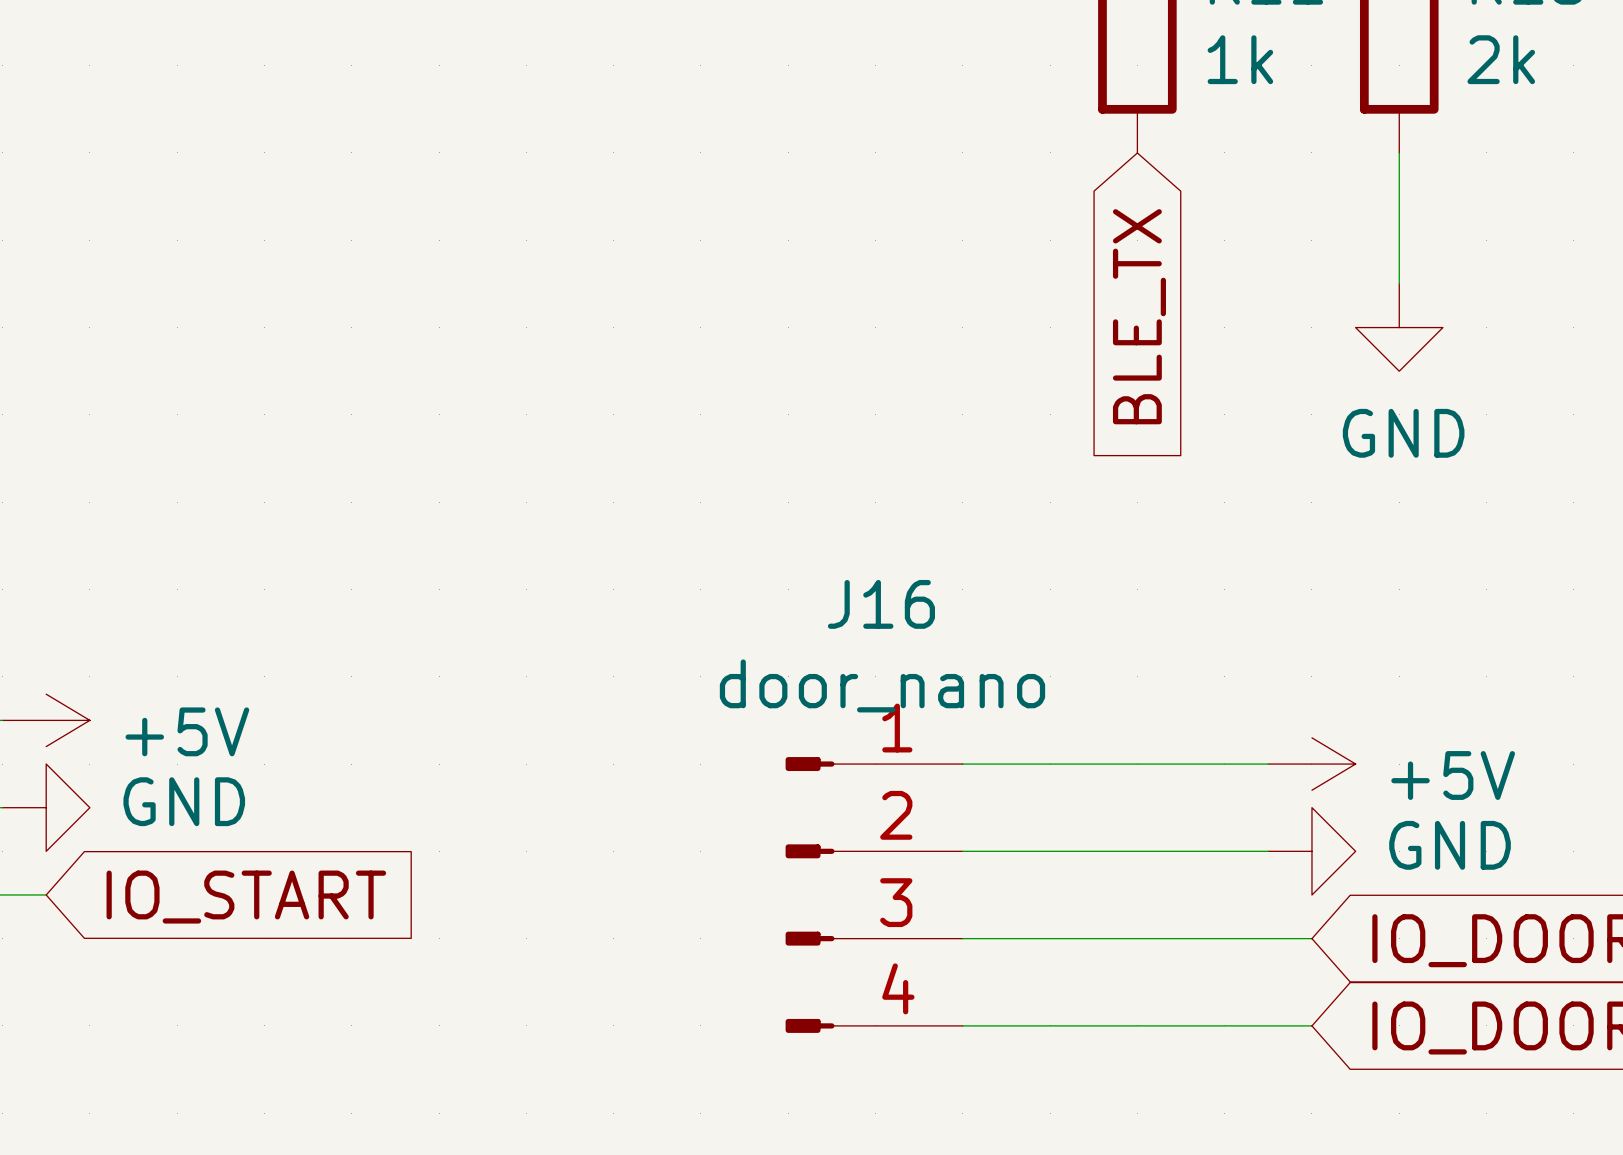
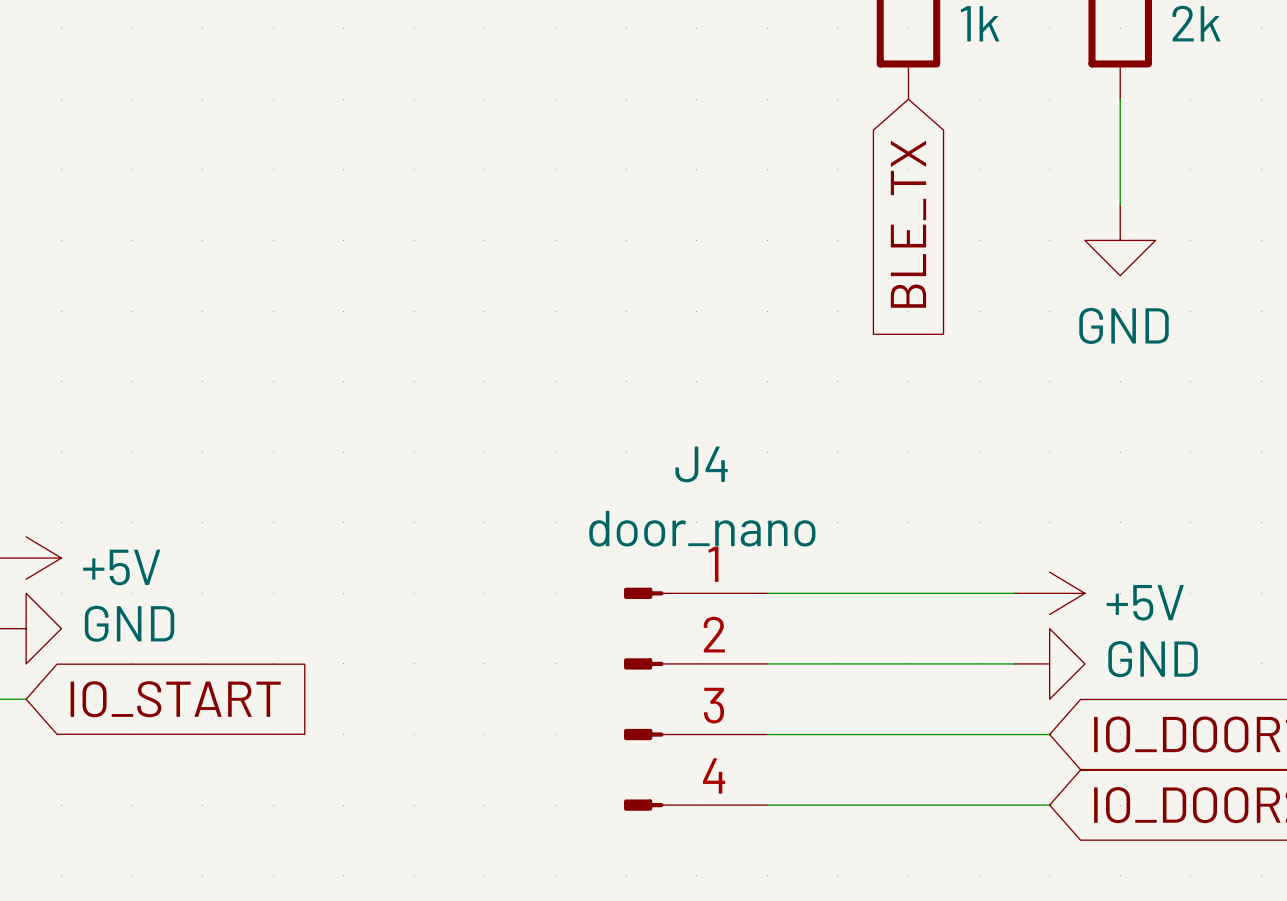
J16 name: J16 (881, 604) -> J4 (701, 464)

